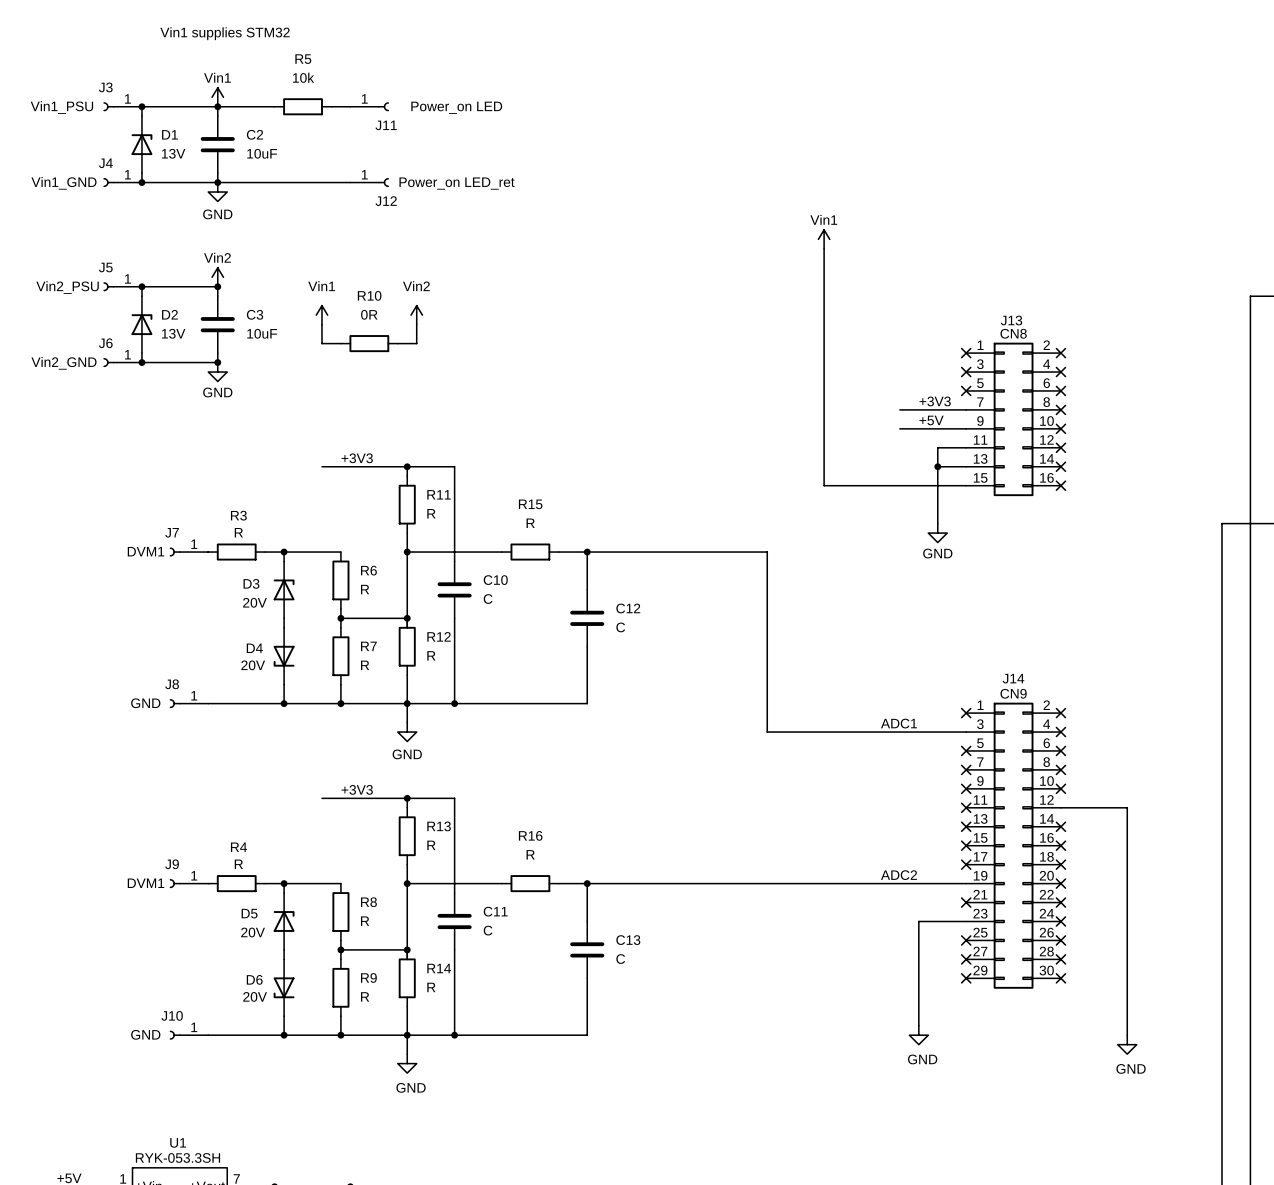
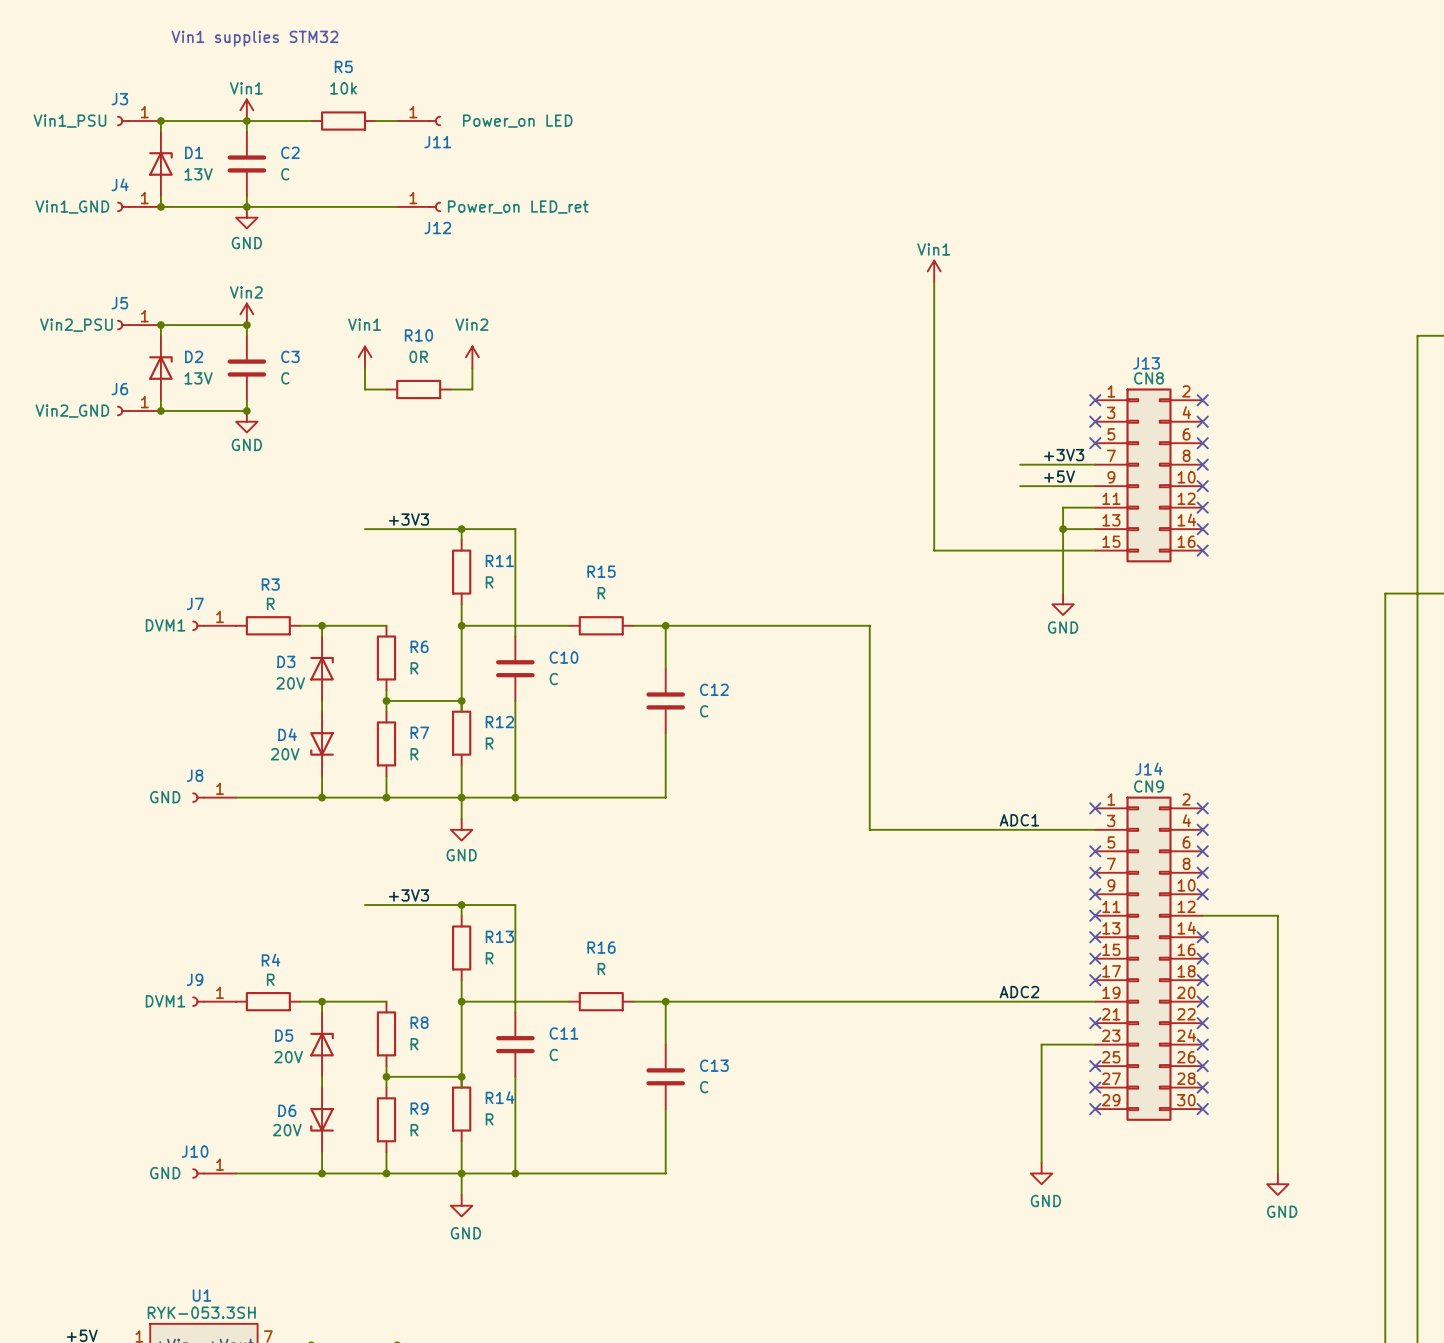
C2 value: 10uF (262, 153) -> C (285, 174)
C3 value: 10uF (262, 333) -> C (285, 378)

